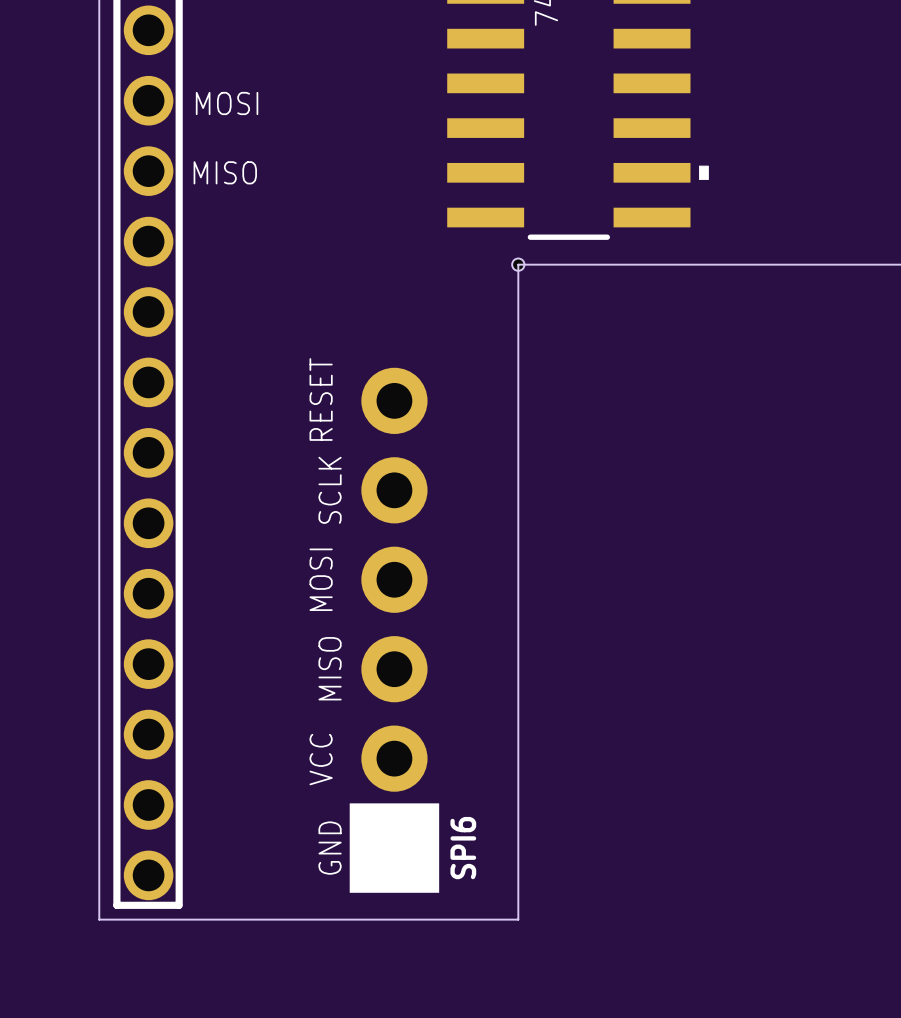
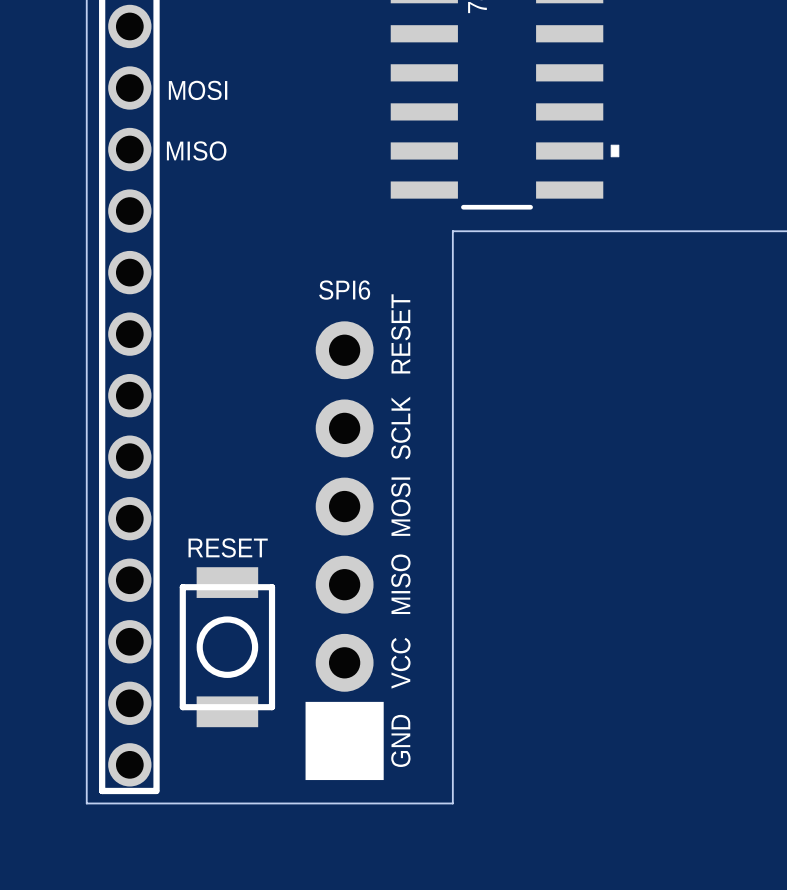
hole: (518, 264) -> none
text position: RESET (321, 399) -> RESET (400, 333)
text position: SCLK (330, 490) -> SCLK (400, 427)
text position: MOSI (321, 579) -> MOSI (400, 506)
text: none -> RESET (228, 547)
text position: MISO (330, 668) -> MISO (400, 584)
part: none -> (227, 647)
text position: VCC (321, 759) -> VCC (400, 663)
text position: GND (330, 848) -> GND (400, 740)
SPI6 name rotation: 0° (463, 848) -> 90° clockwise (344, 290)
SPI6 name position: SPI6 (463, 848) -> SPI6 (344, 290)

